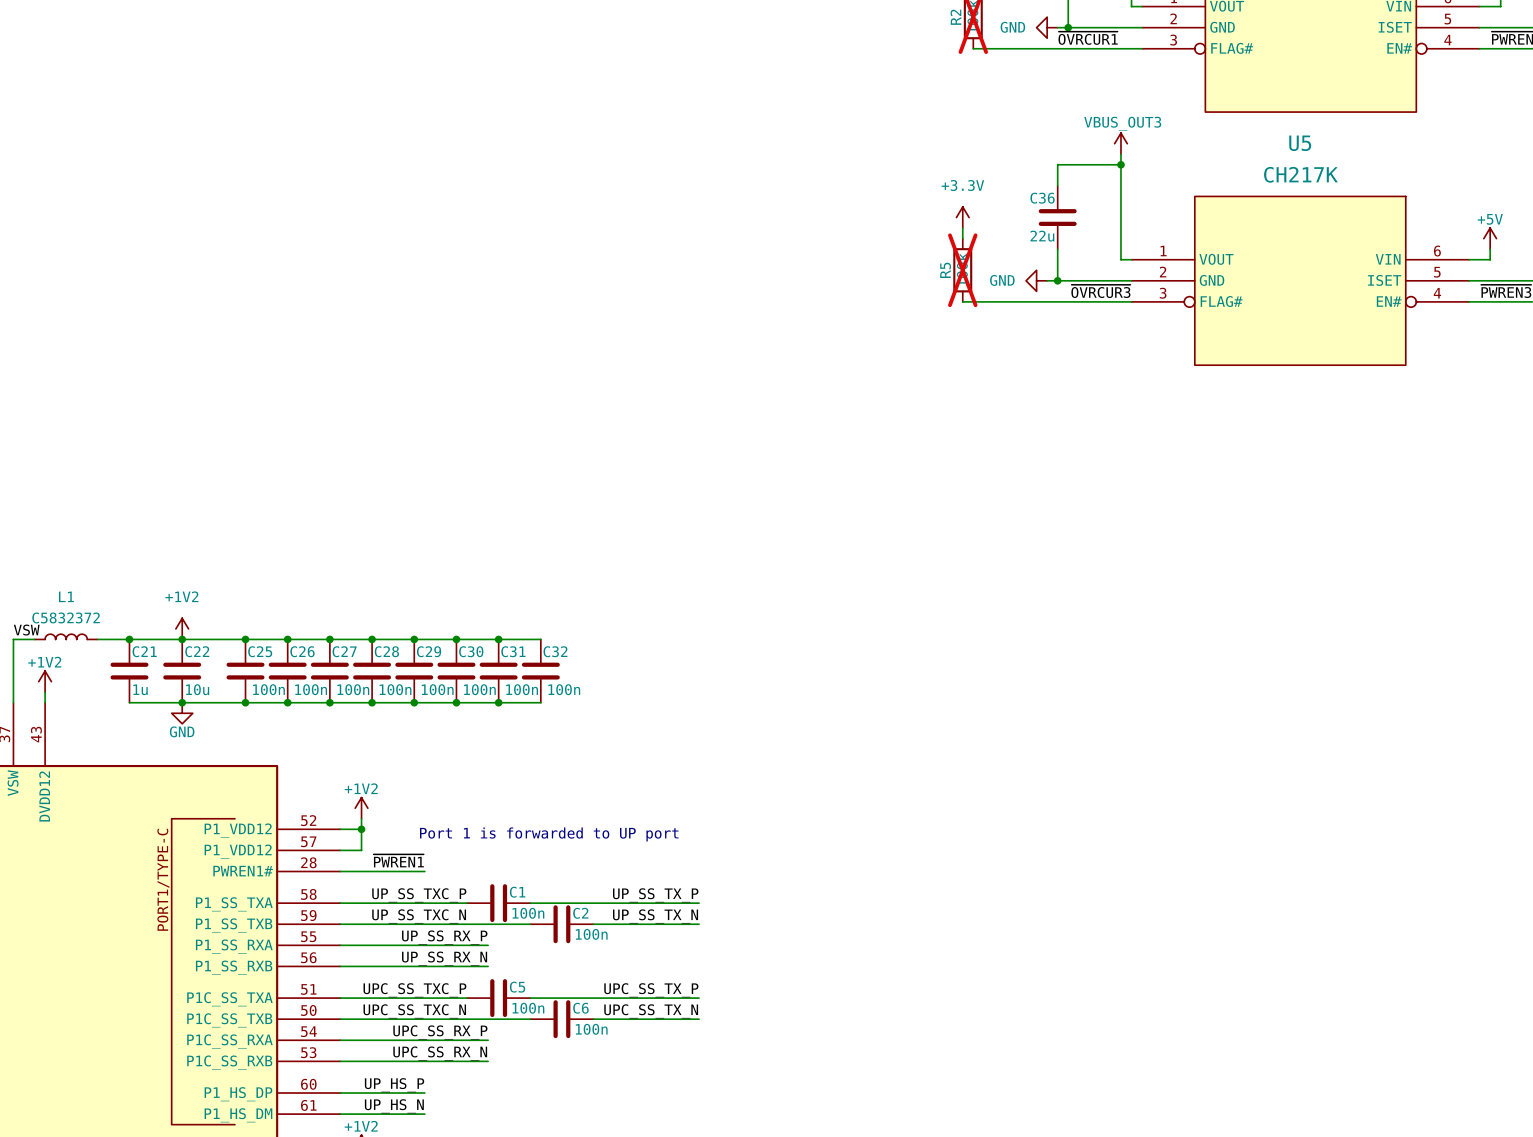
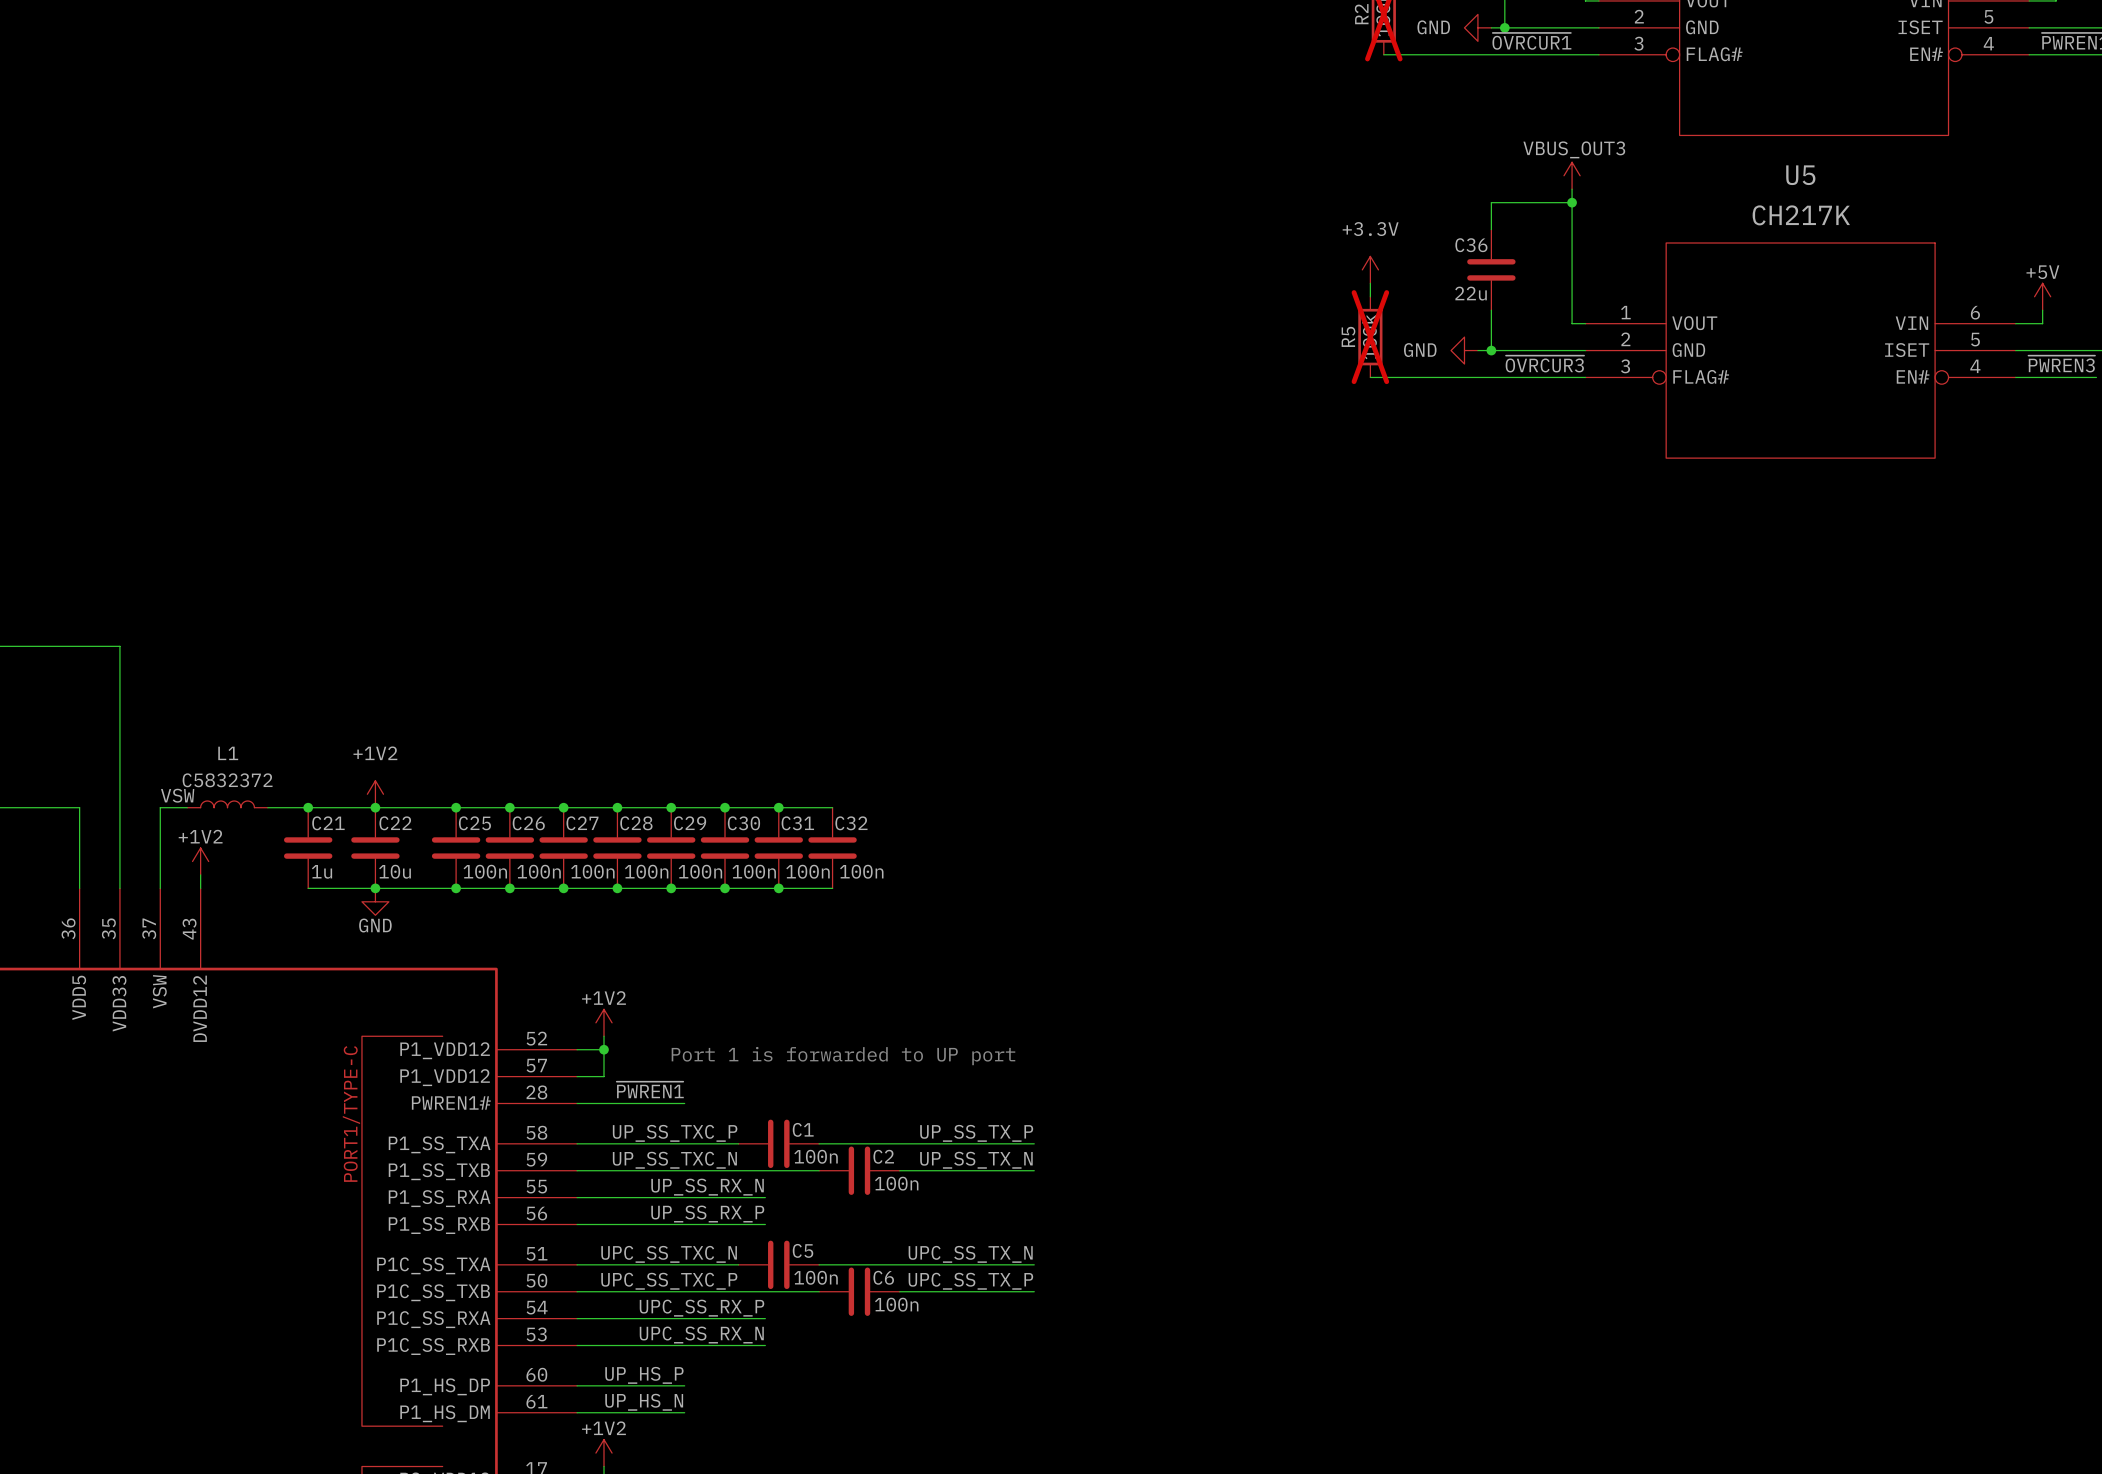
label: UP_SS_RX_P (444, 937) -> UP_SS_RX_N (707, 1187)
label: UP_SS_RX_N (444, 958) -> UP_SS_RX_P (707, 1214)
label: UPC_SS_TXC_P (414, 990) -> UPC_SS_TXC_N (669, 1254)
label: UPC_SS_TX_P (651, 990) -> UPC_SS_TX_N (970, 1254)
label: UPC_SS_TXC_N (414, 1011) -> UPC_SS_TXC_P (669, 1281)
label: UPC_SS_TX_N (651, 1011) -> UPC_SS_TX_P (970, 1281)

